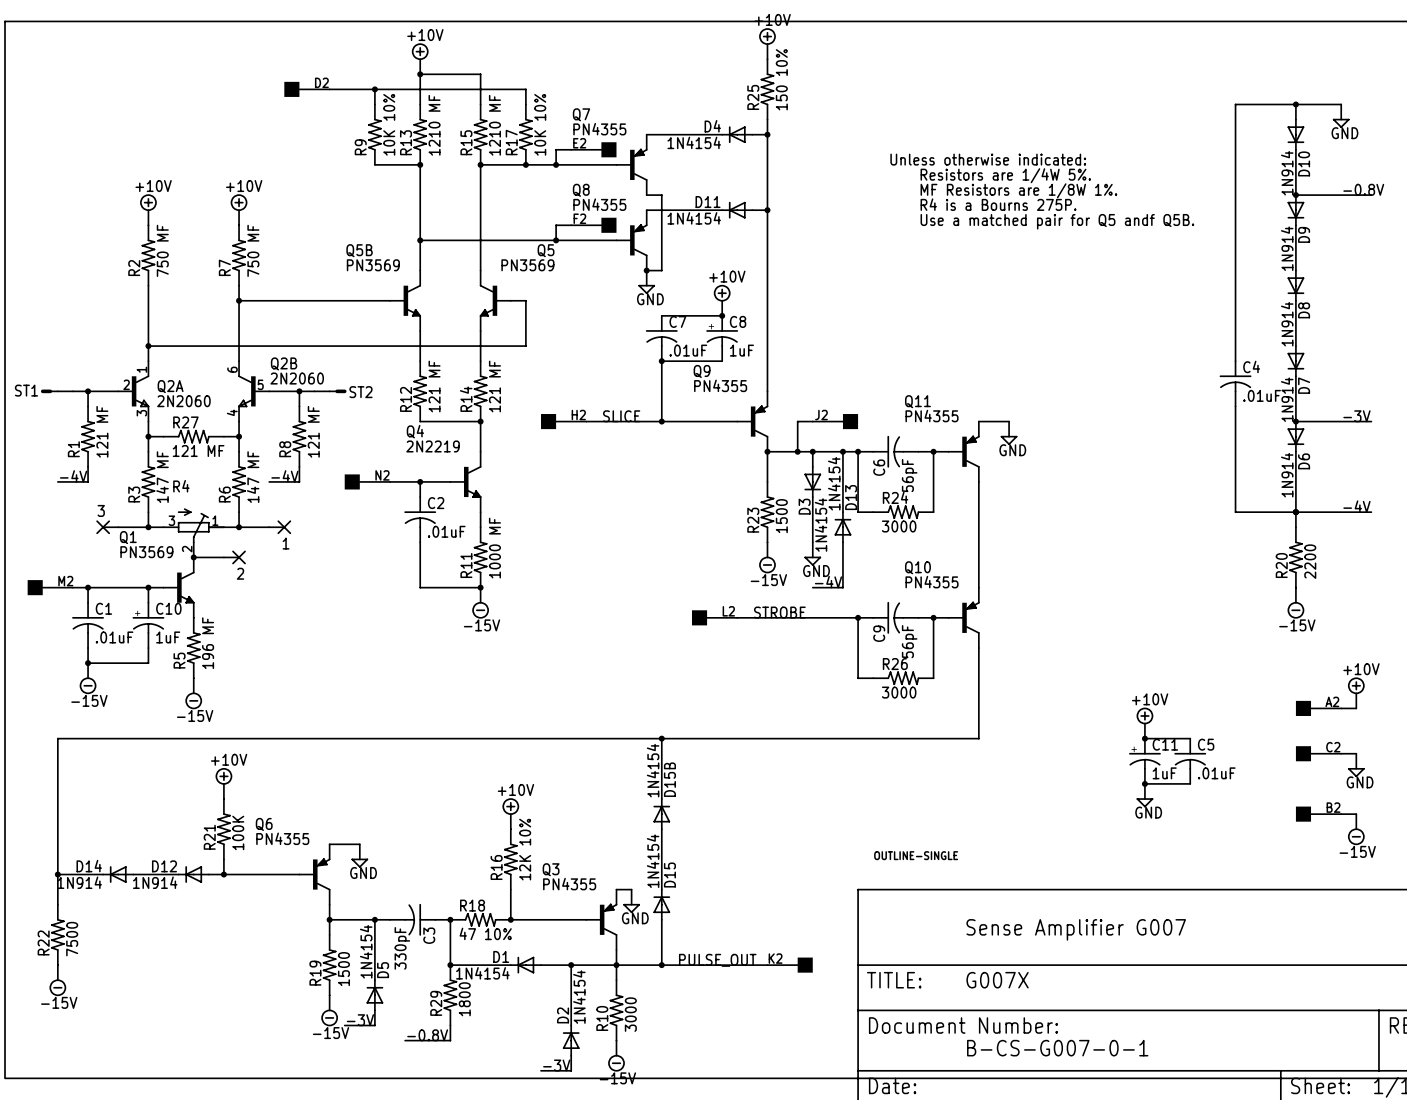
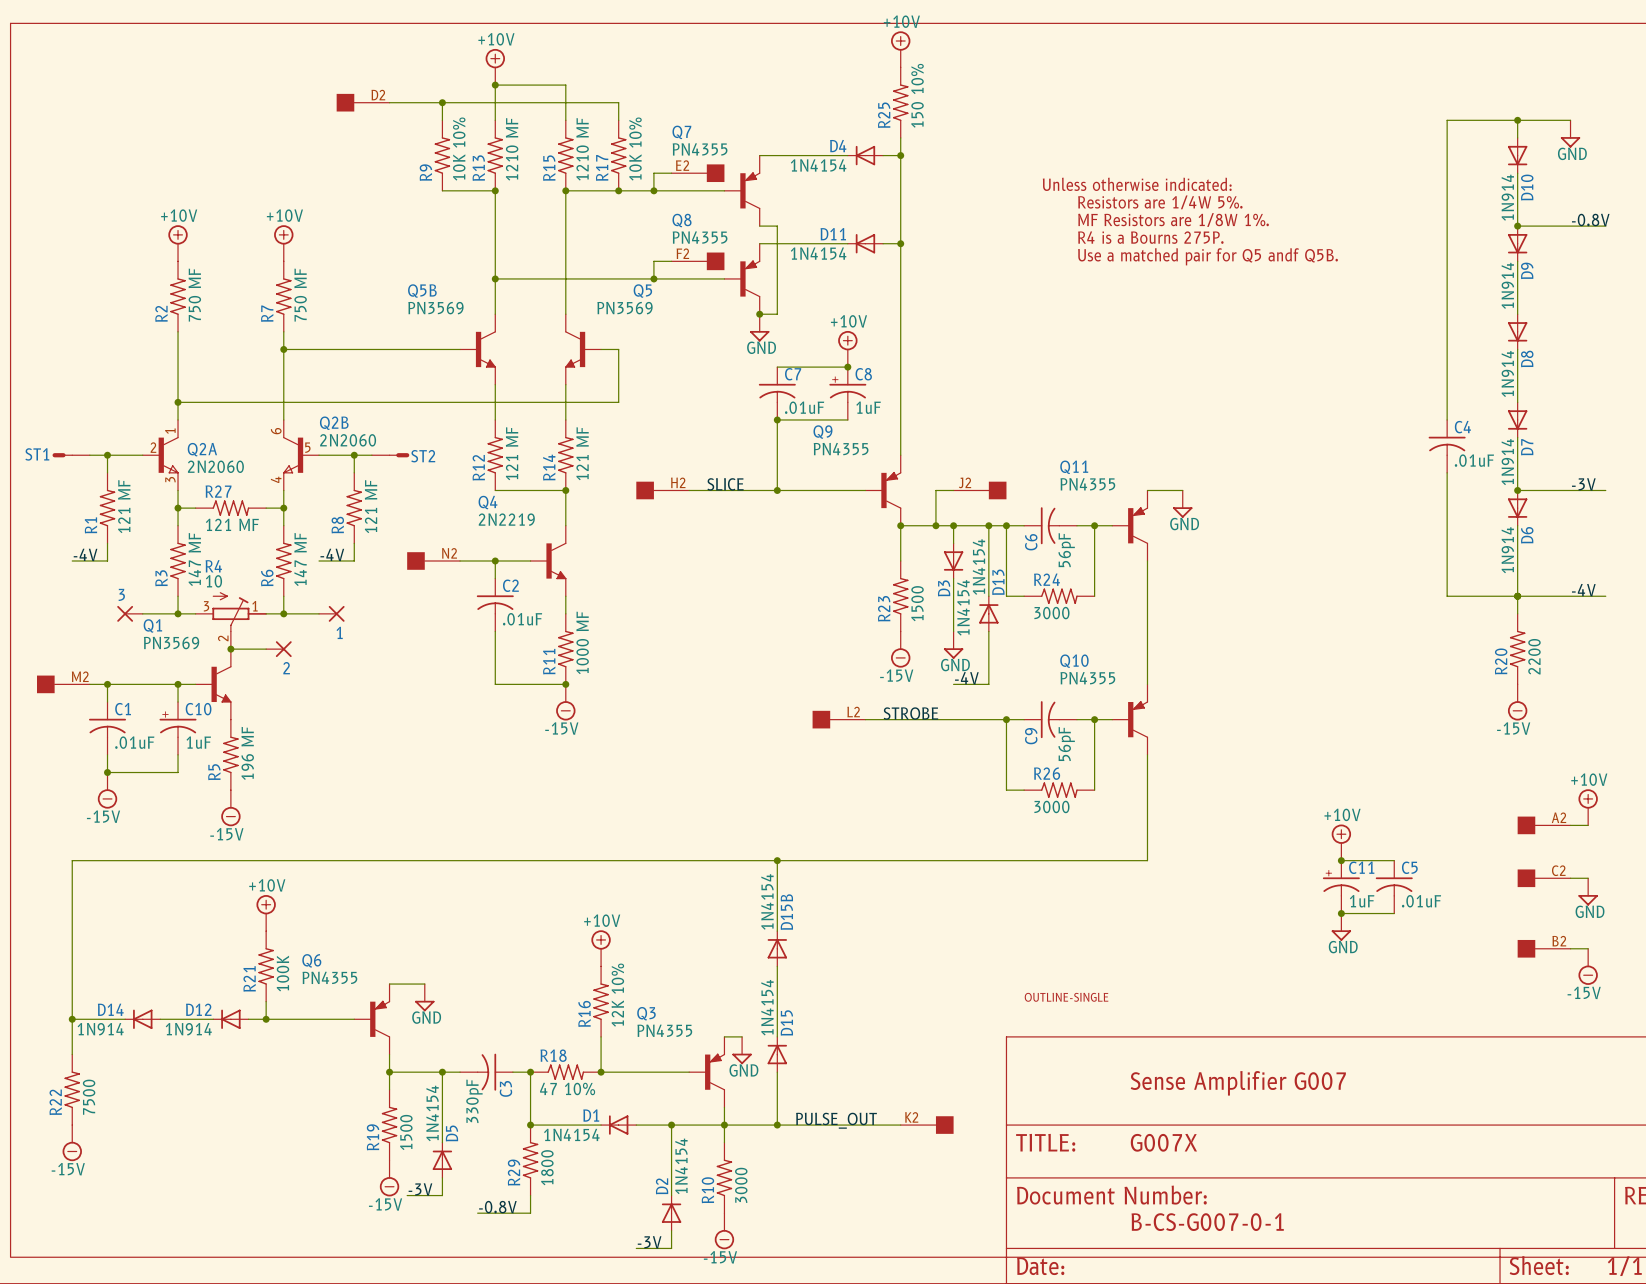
R4 value: none -> 10 (213, 581)

